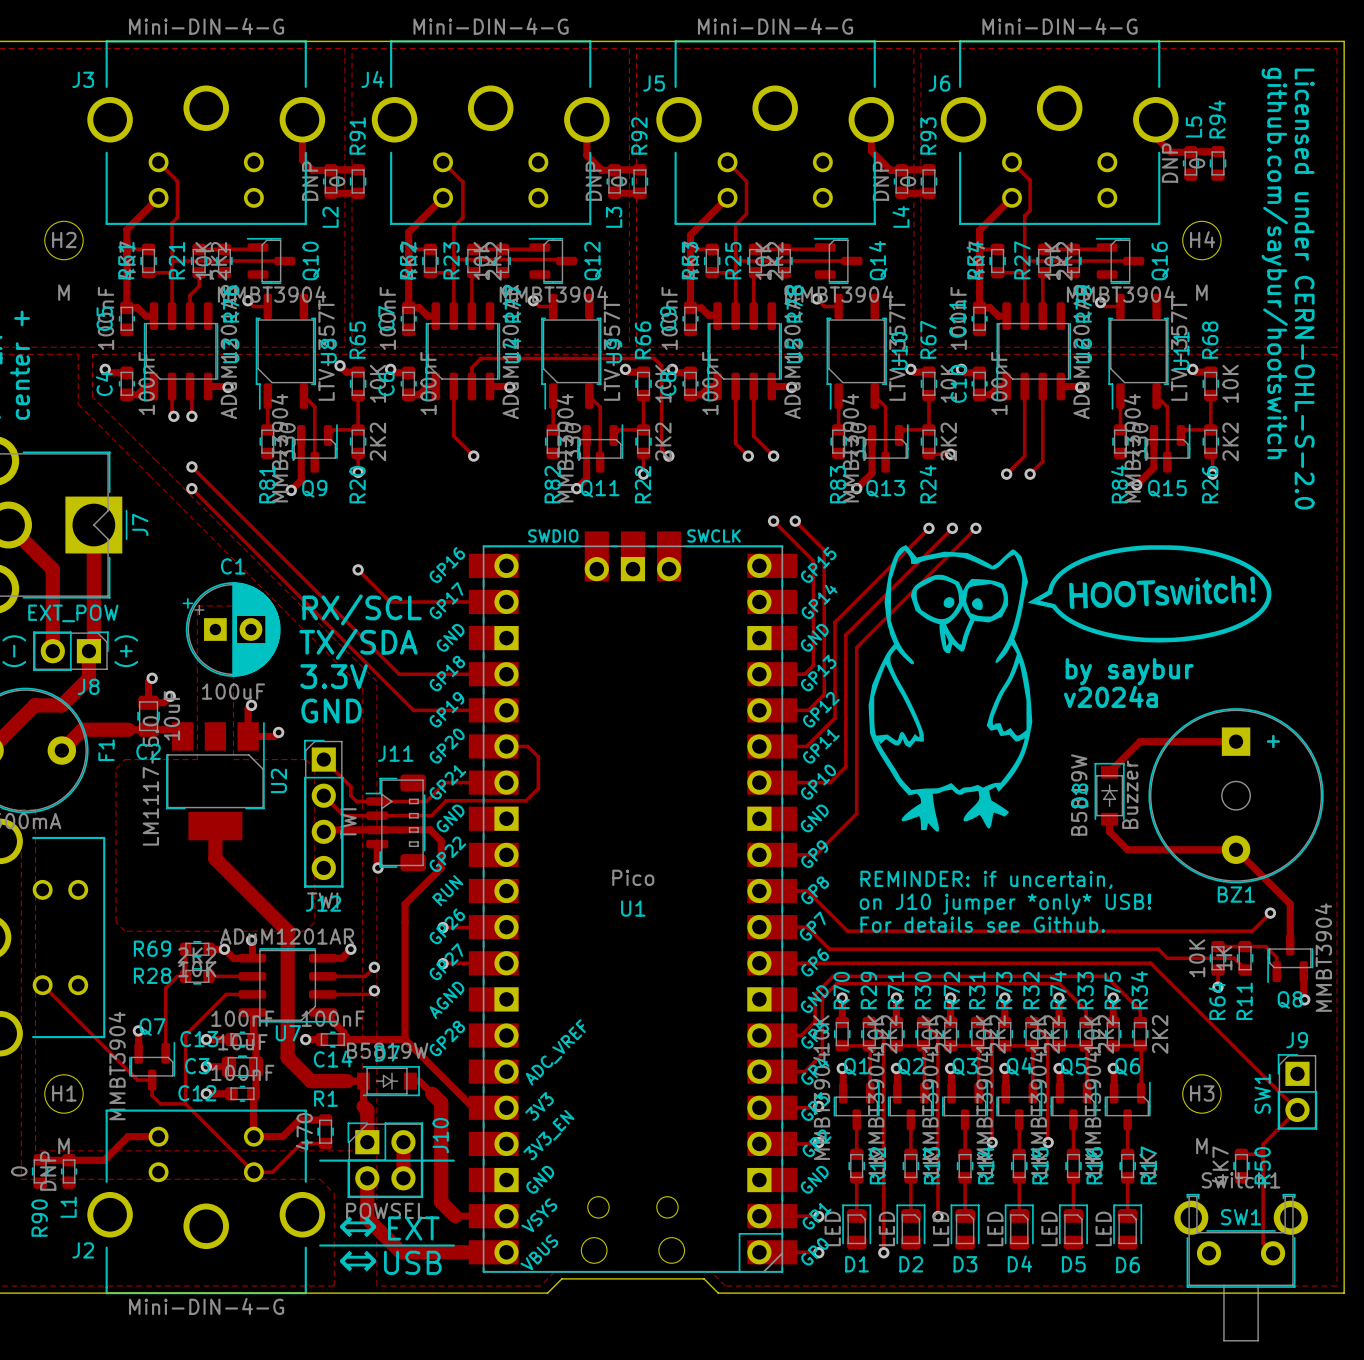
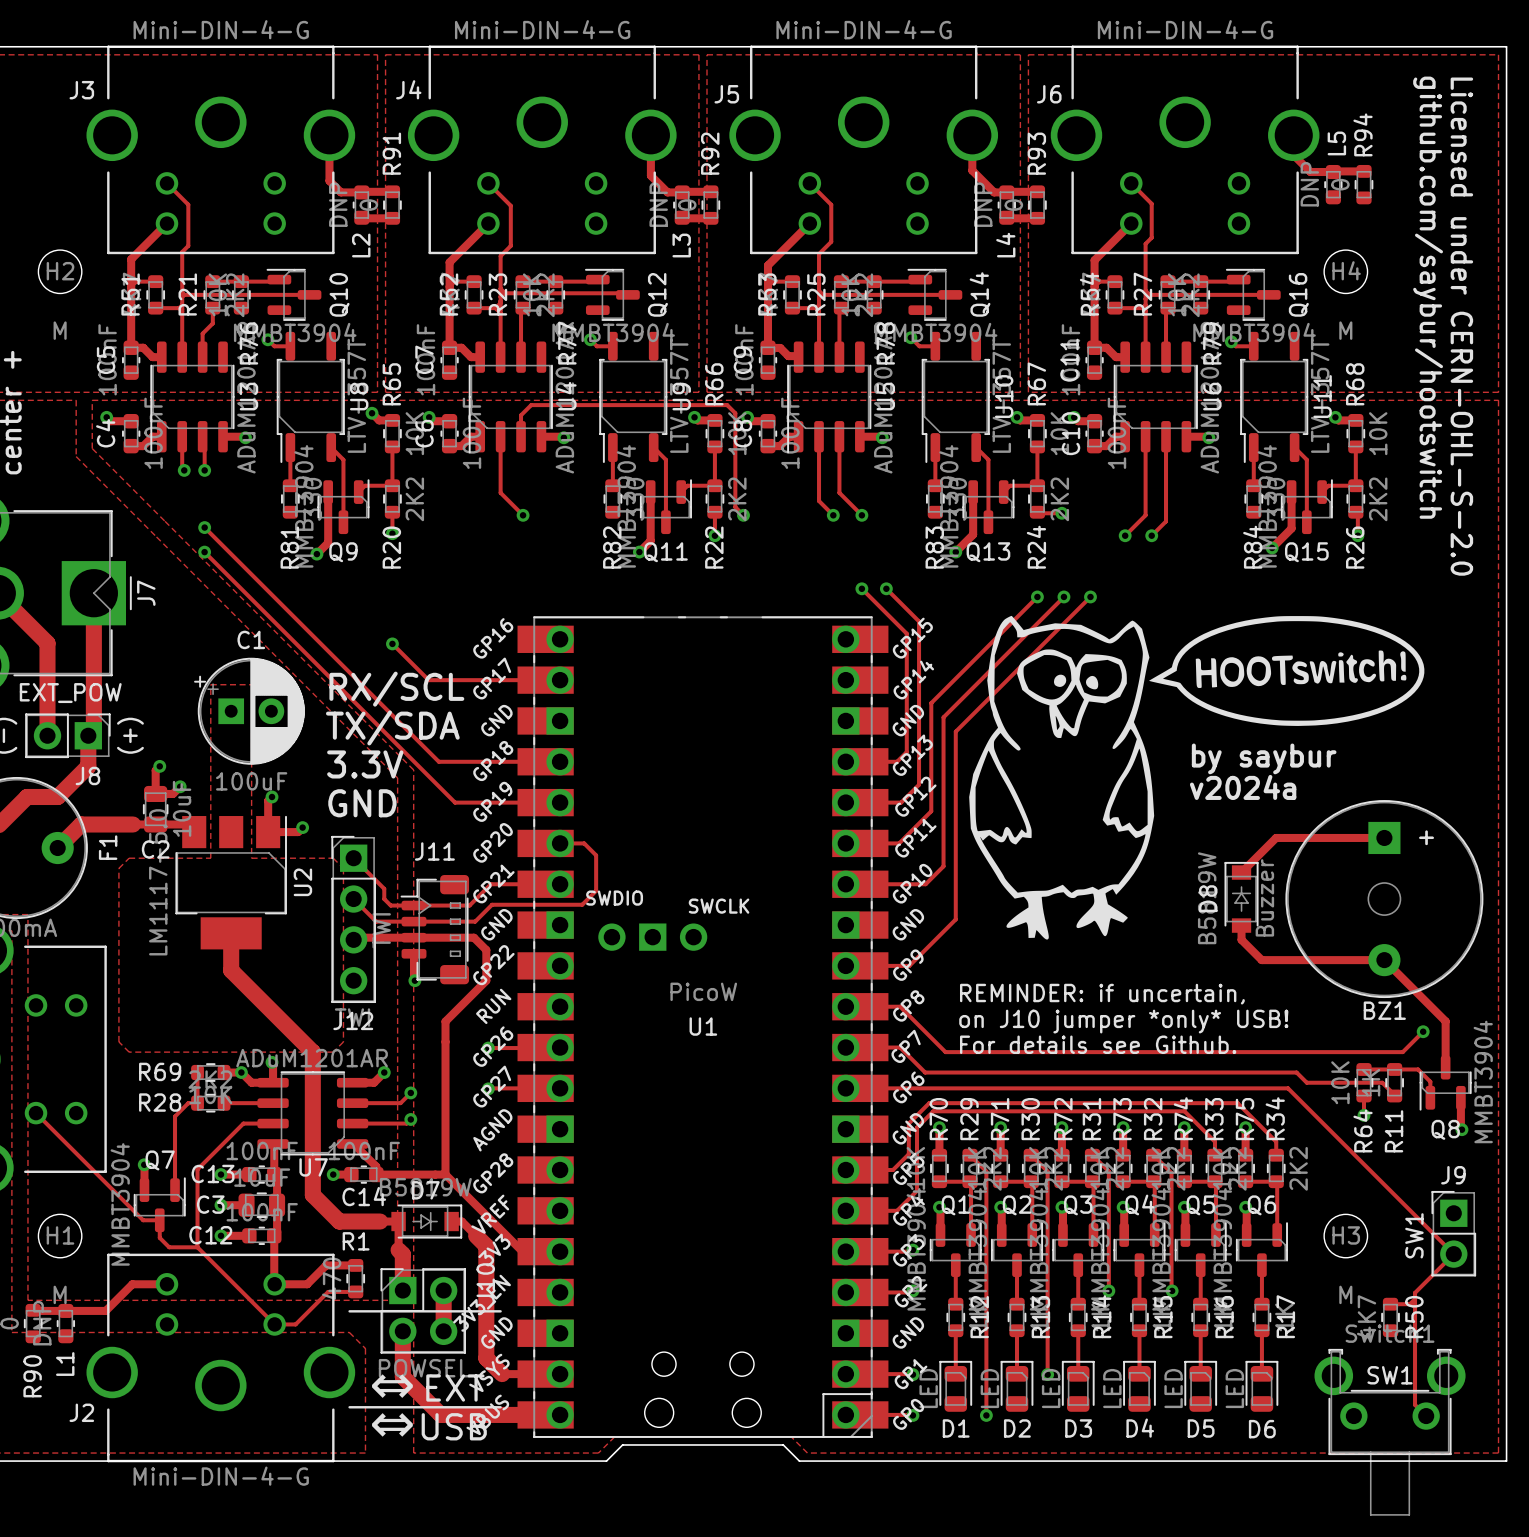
U1 footprint: [468, 531, 798, 1273] -> [517, 616, 889, 1438]
U1 value: Pico (633, 877) -> PicoW (703, 991)

